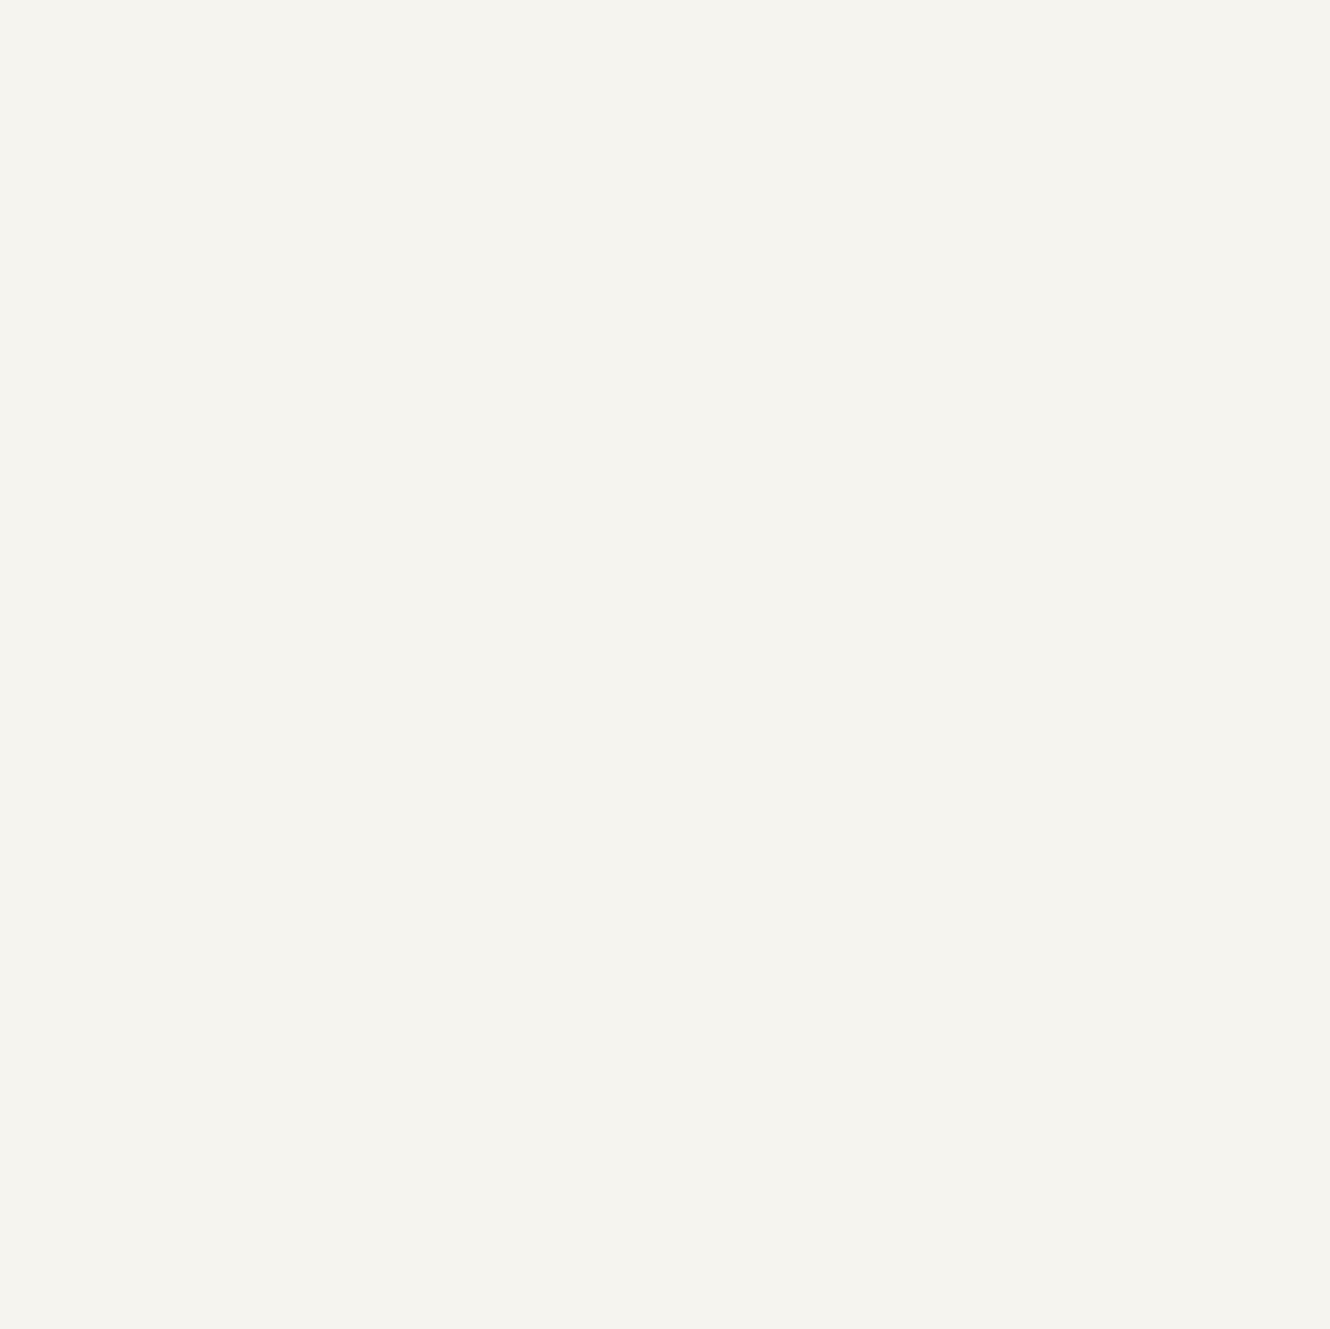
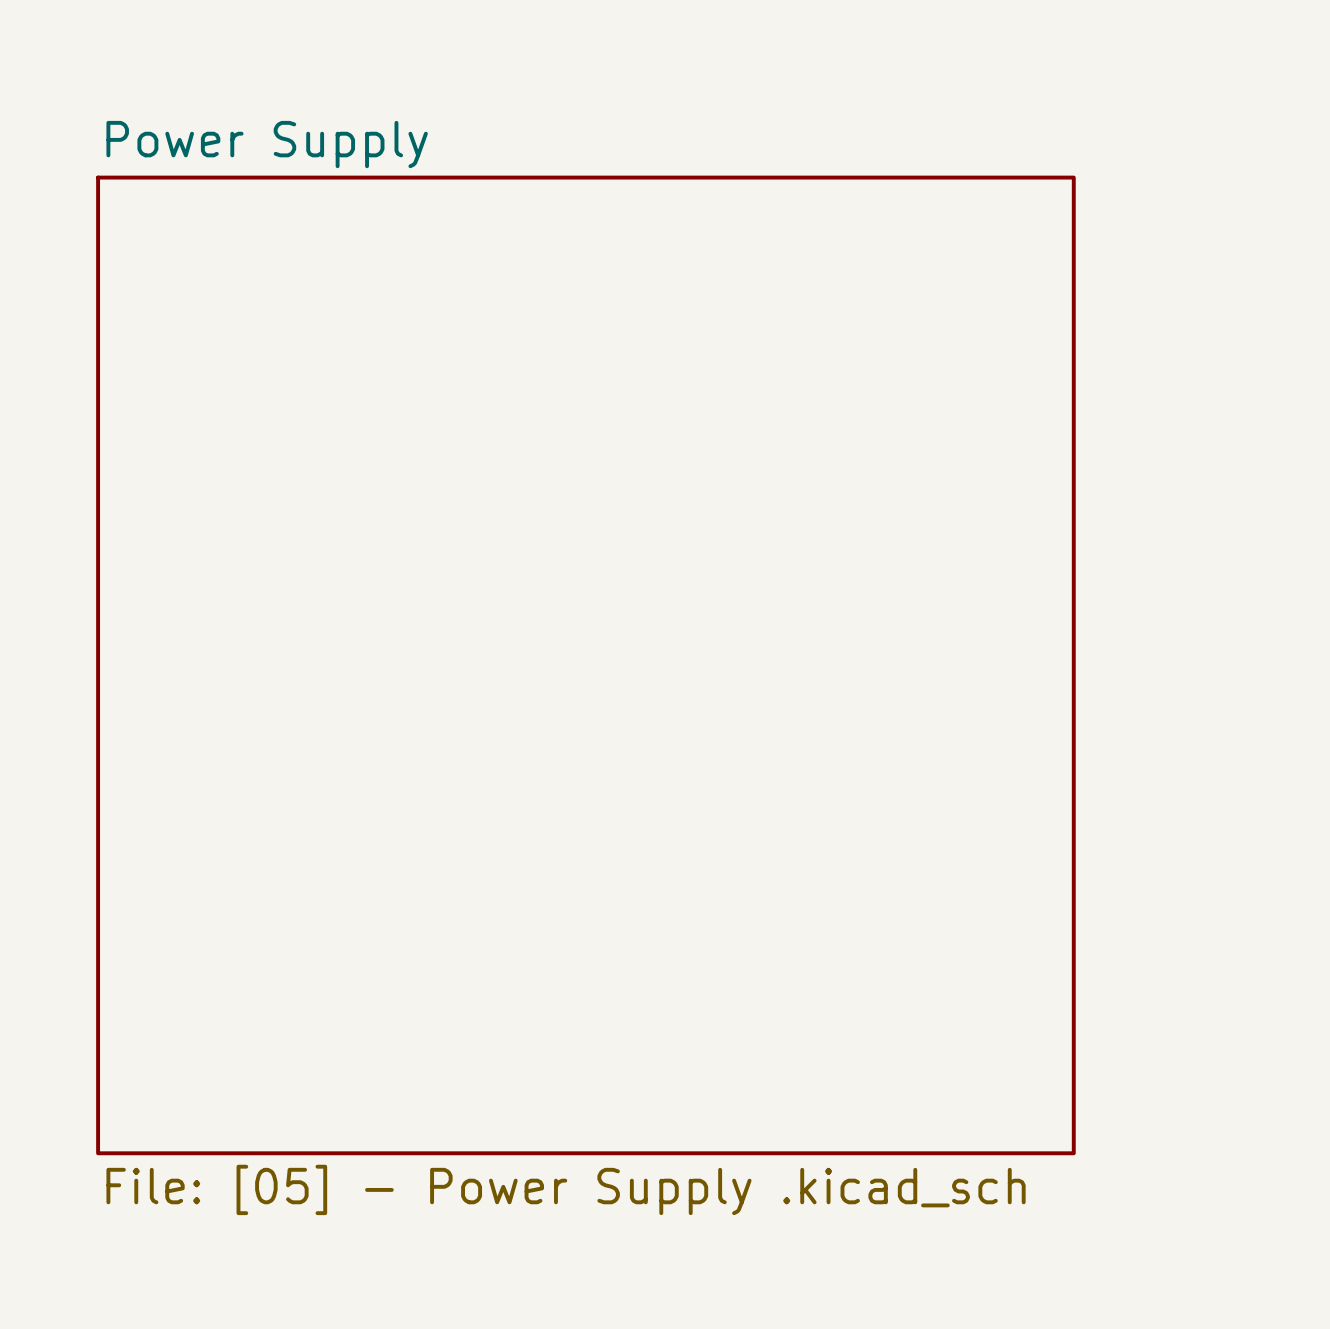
sheet Power Supply: none -> File: [05] - Power Supply .kicad_sch (585, 665)

